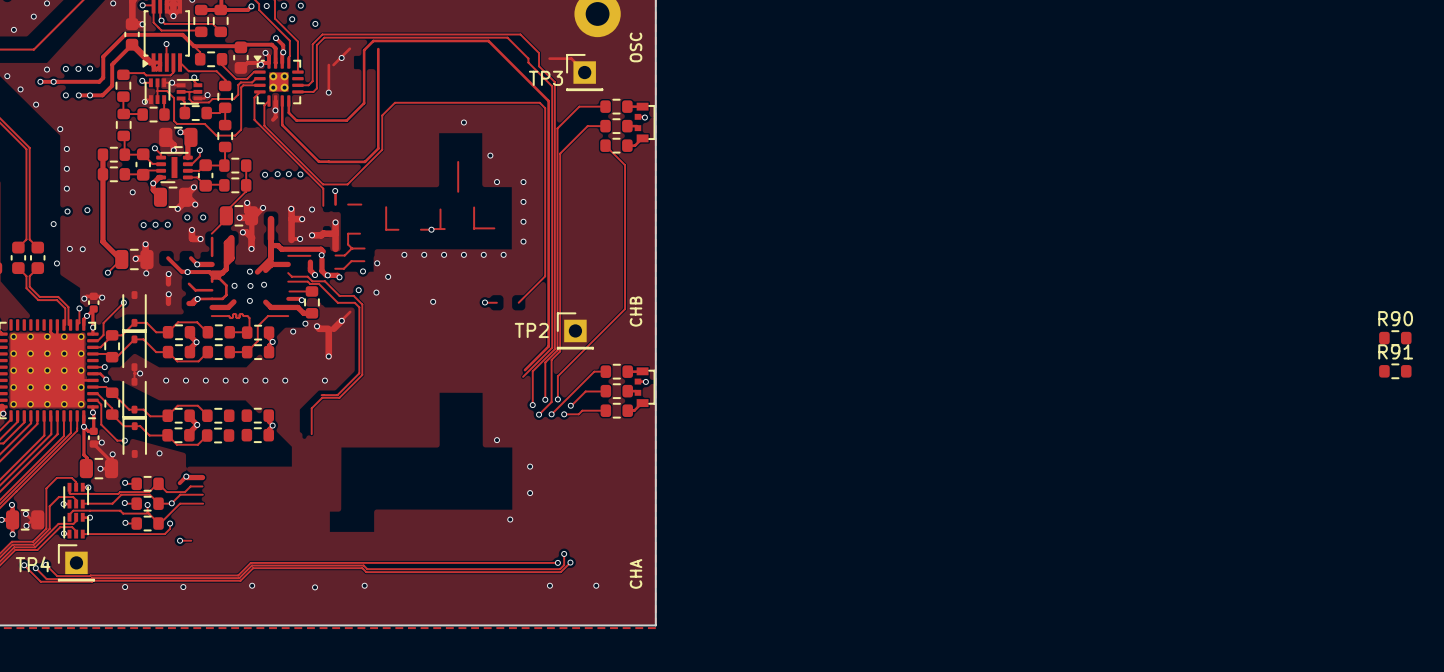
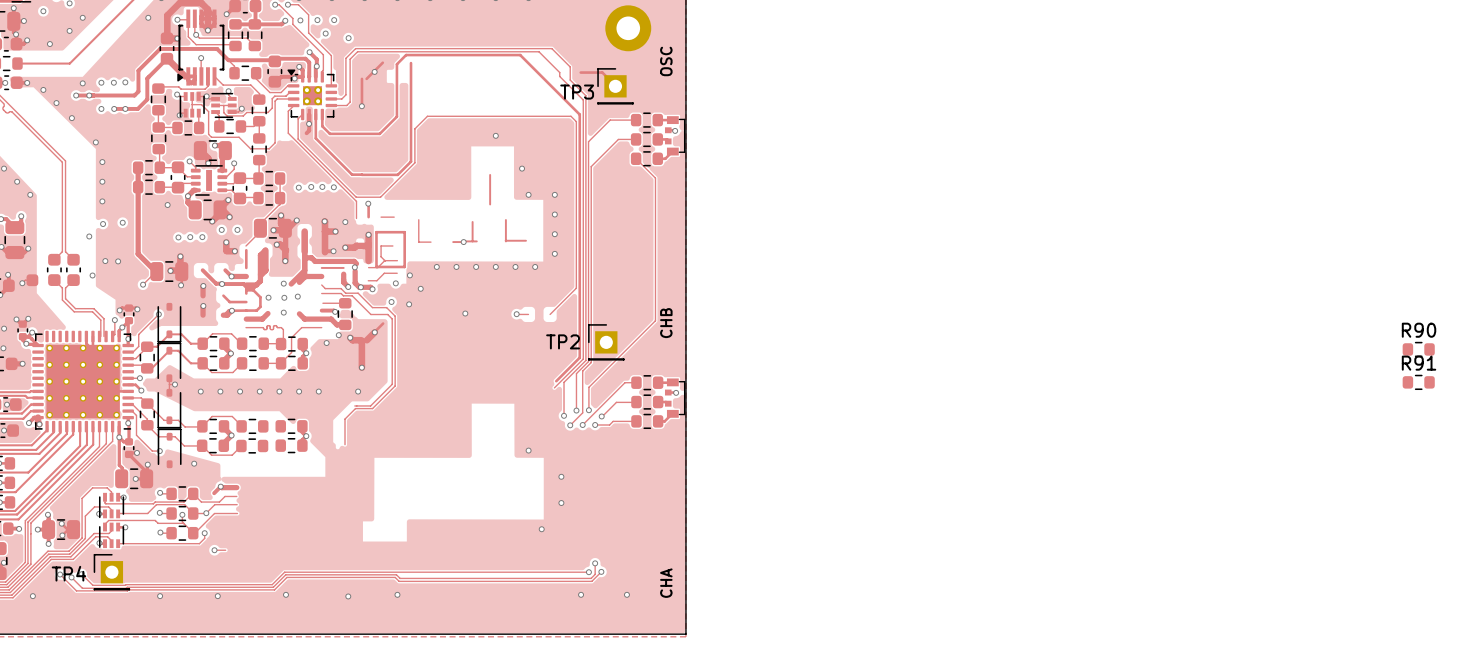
track: none -> (376, 232) (404, 232) (404, 266) (376, 266) (376, 232)

